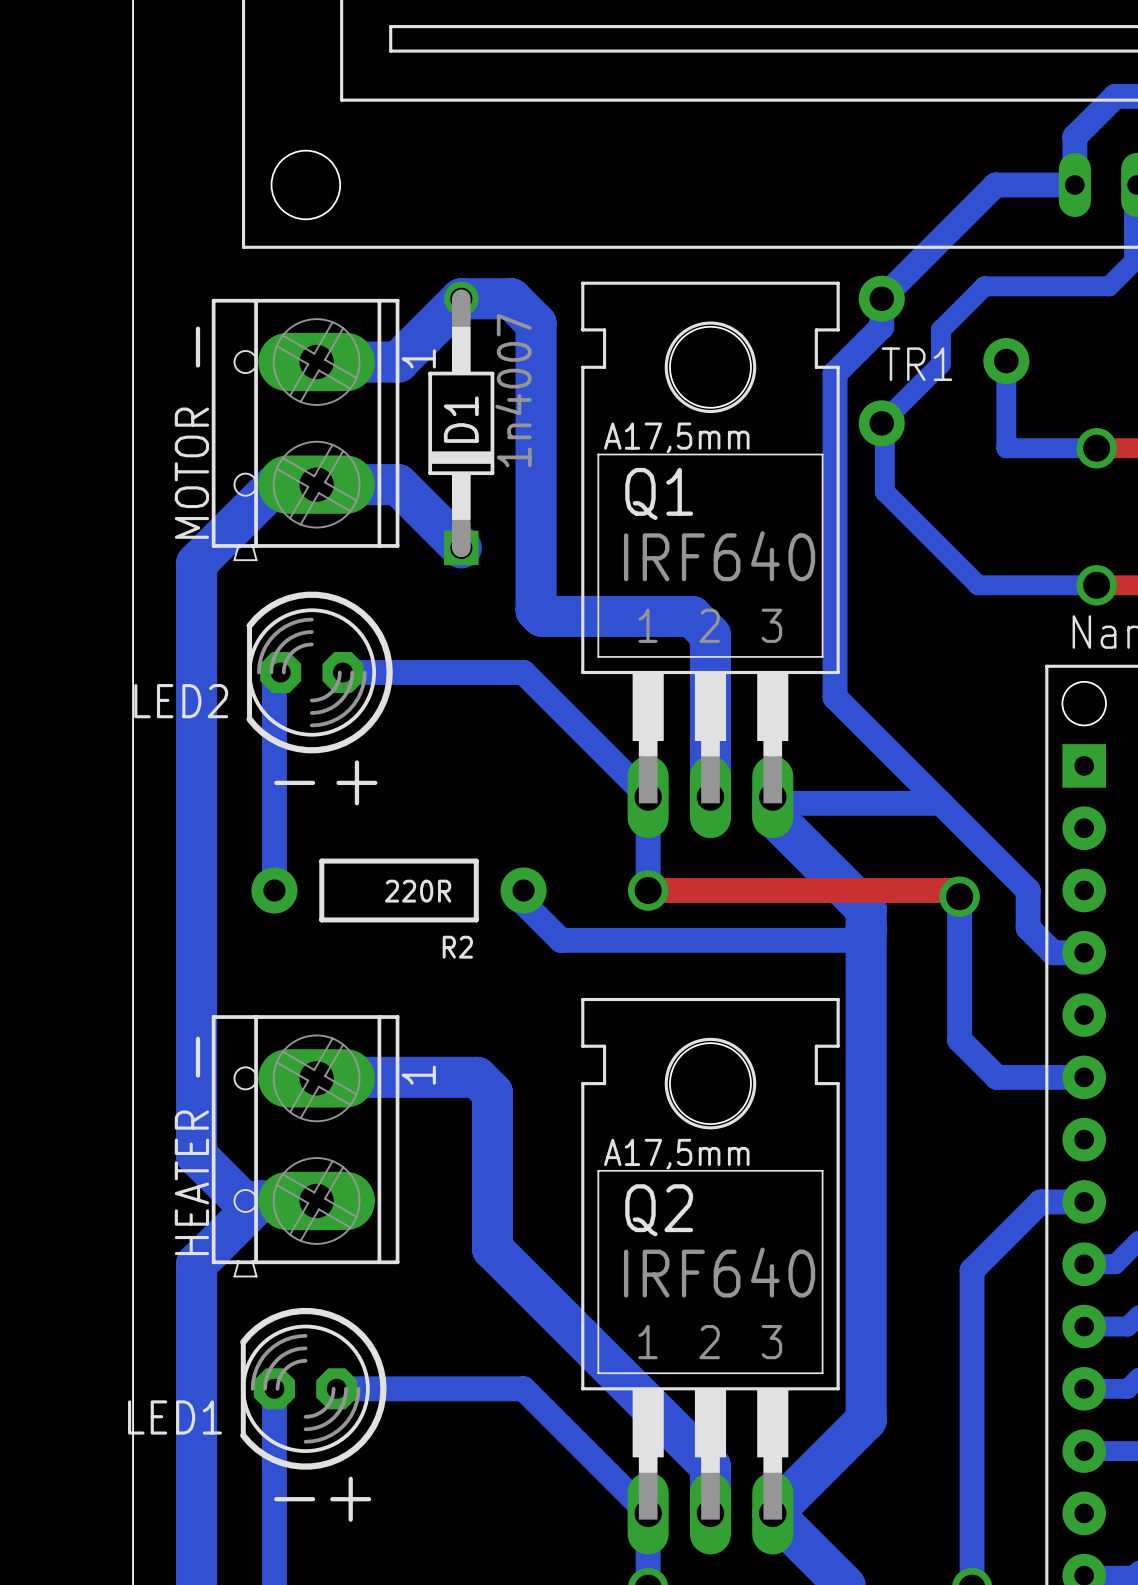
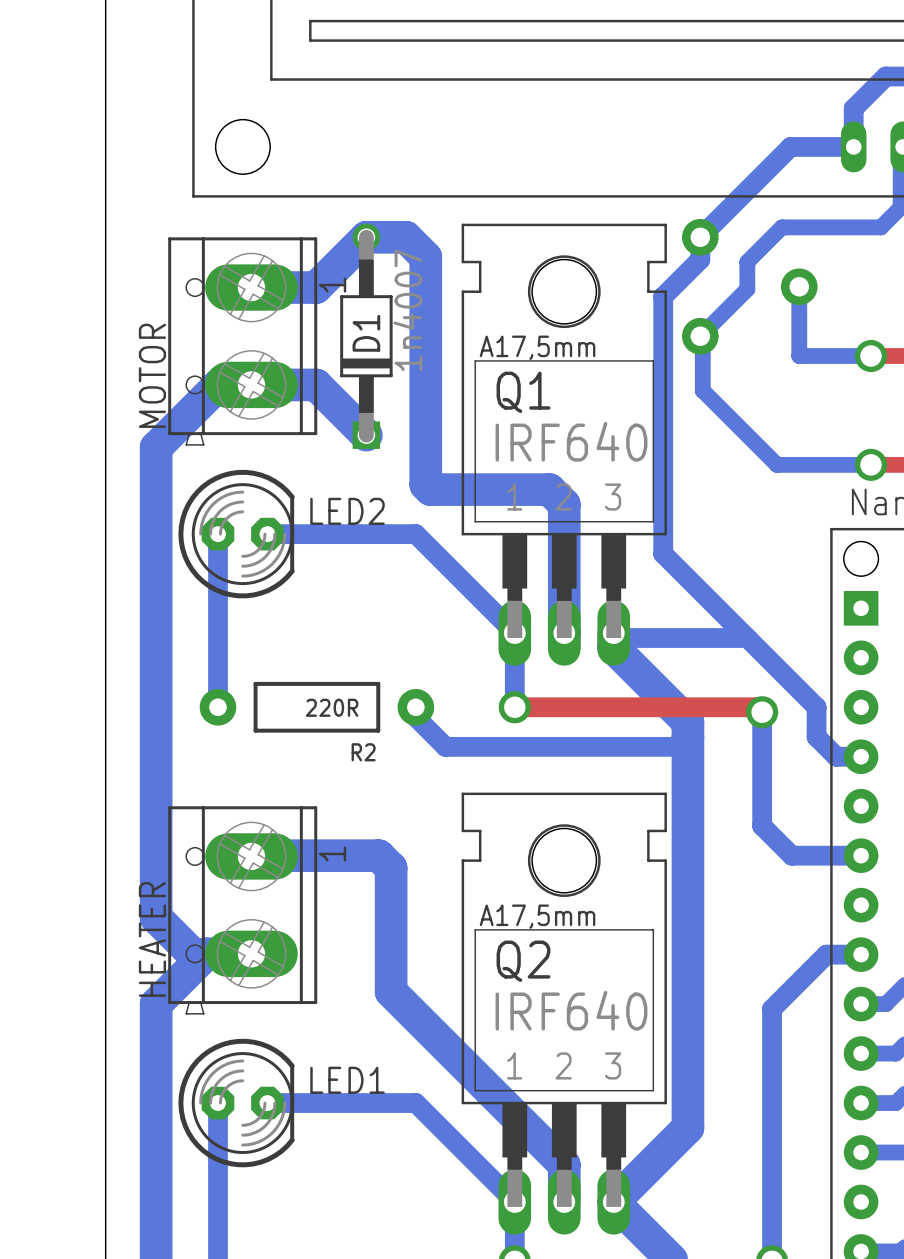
text: - (197, 347) -> none
text: TR1 (916, 364) -> none
LED2 rotation: 0° (319, 672) -> 180° (236, 534)
text: - (294, 782) -> none
text: + (356, 782) -> none
text: - (197, 1057) -> none
LED1 rotation: 0° (313, 1388) -> 180° (236, 1103)
text: - (294, 1499) -> none
text: + (350, 1499) -> none

